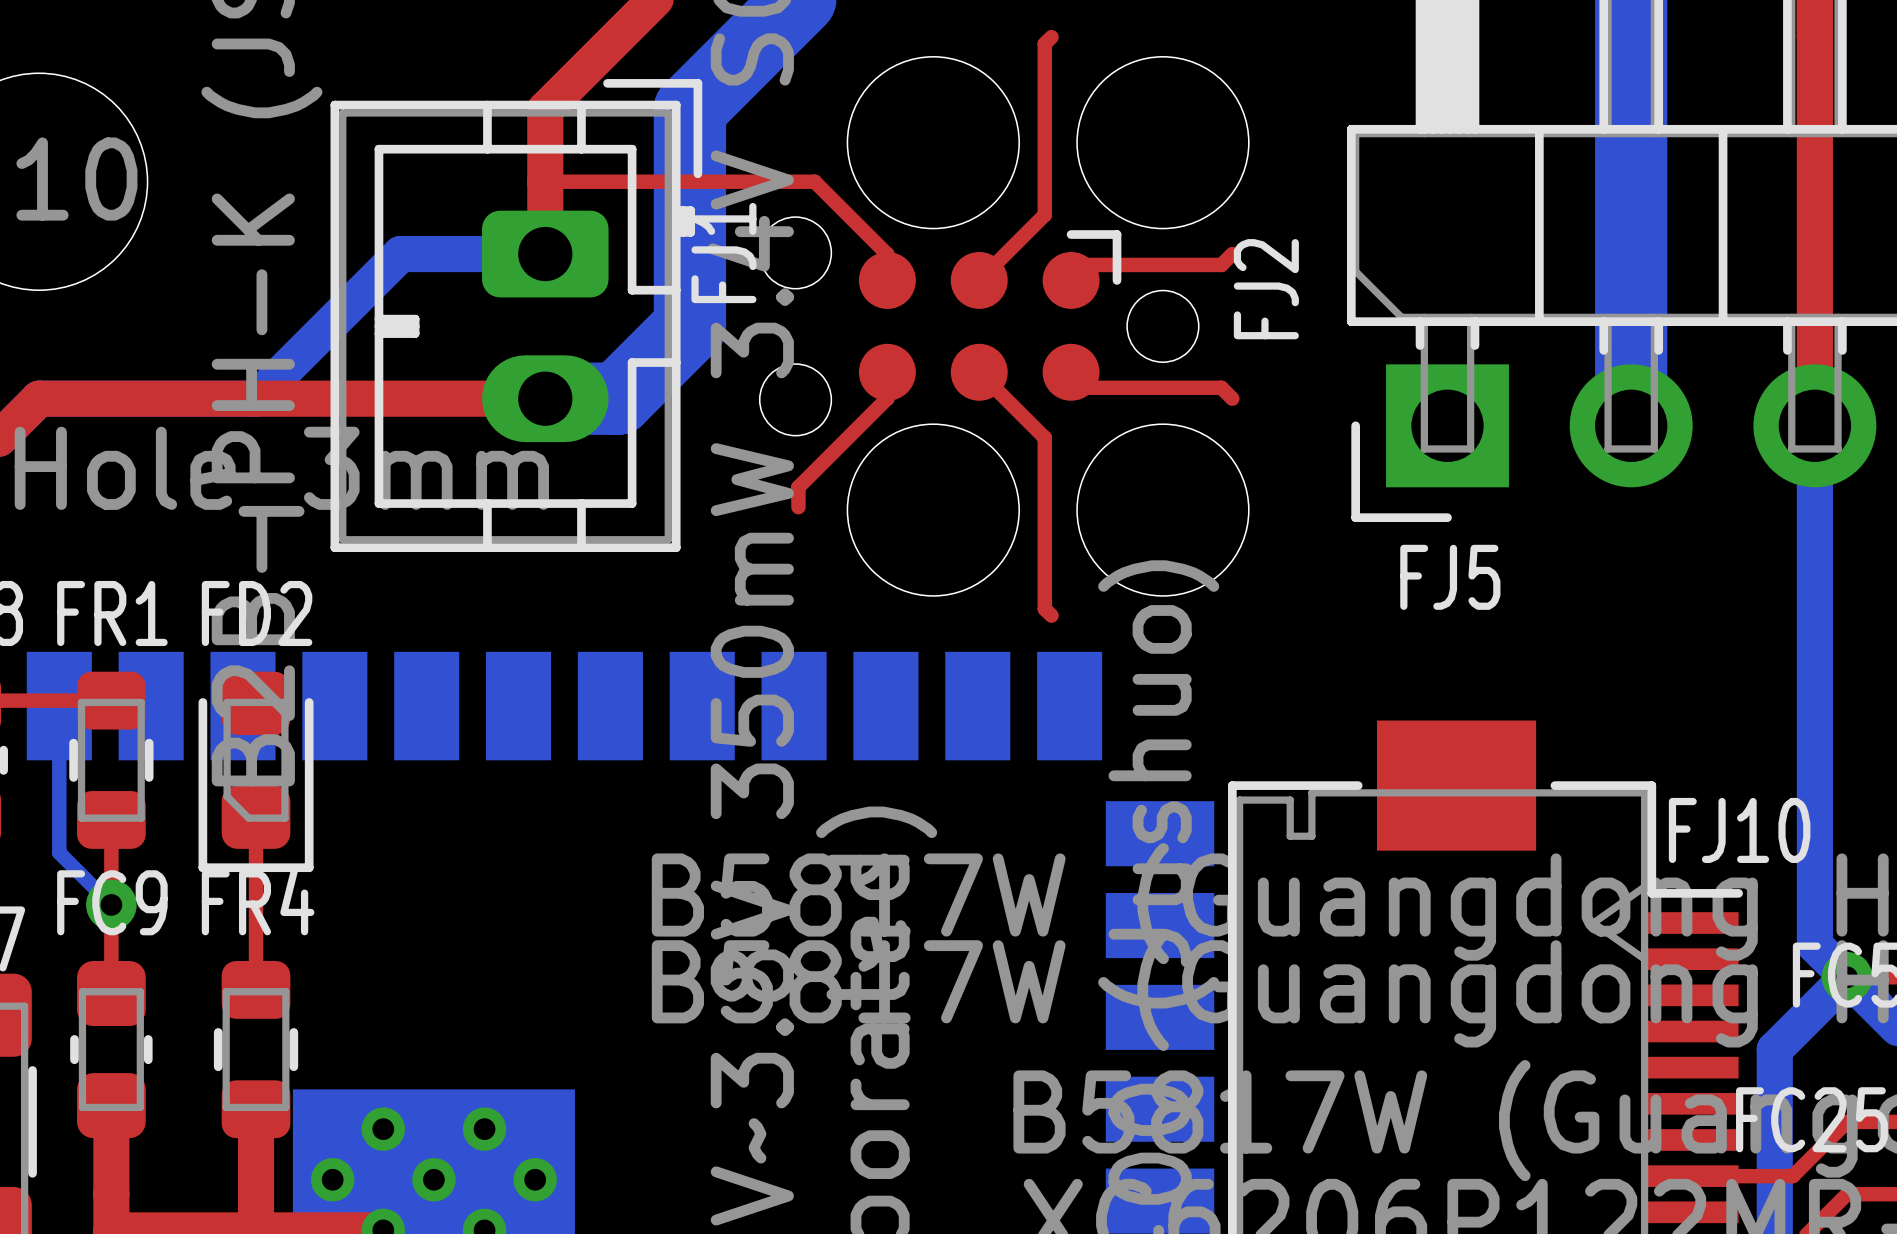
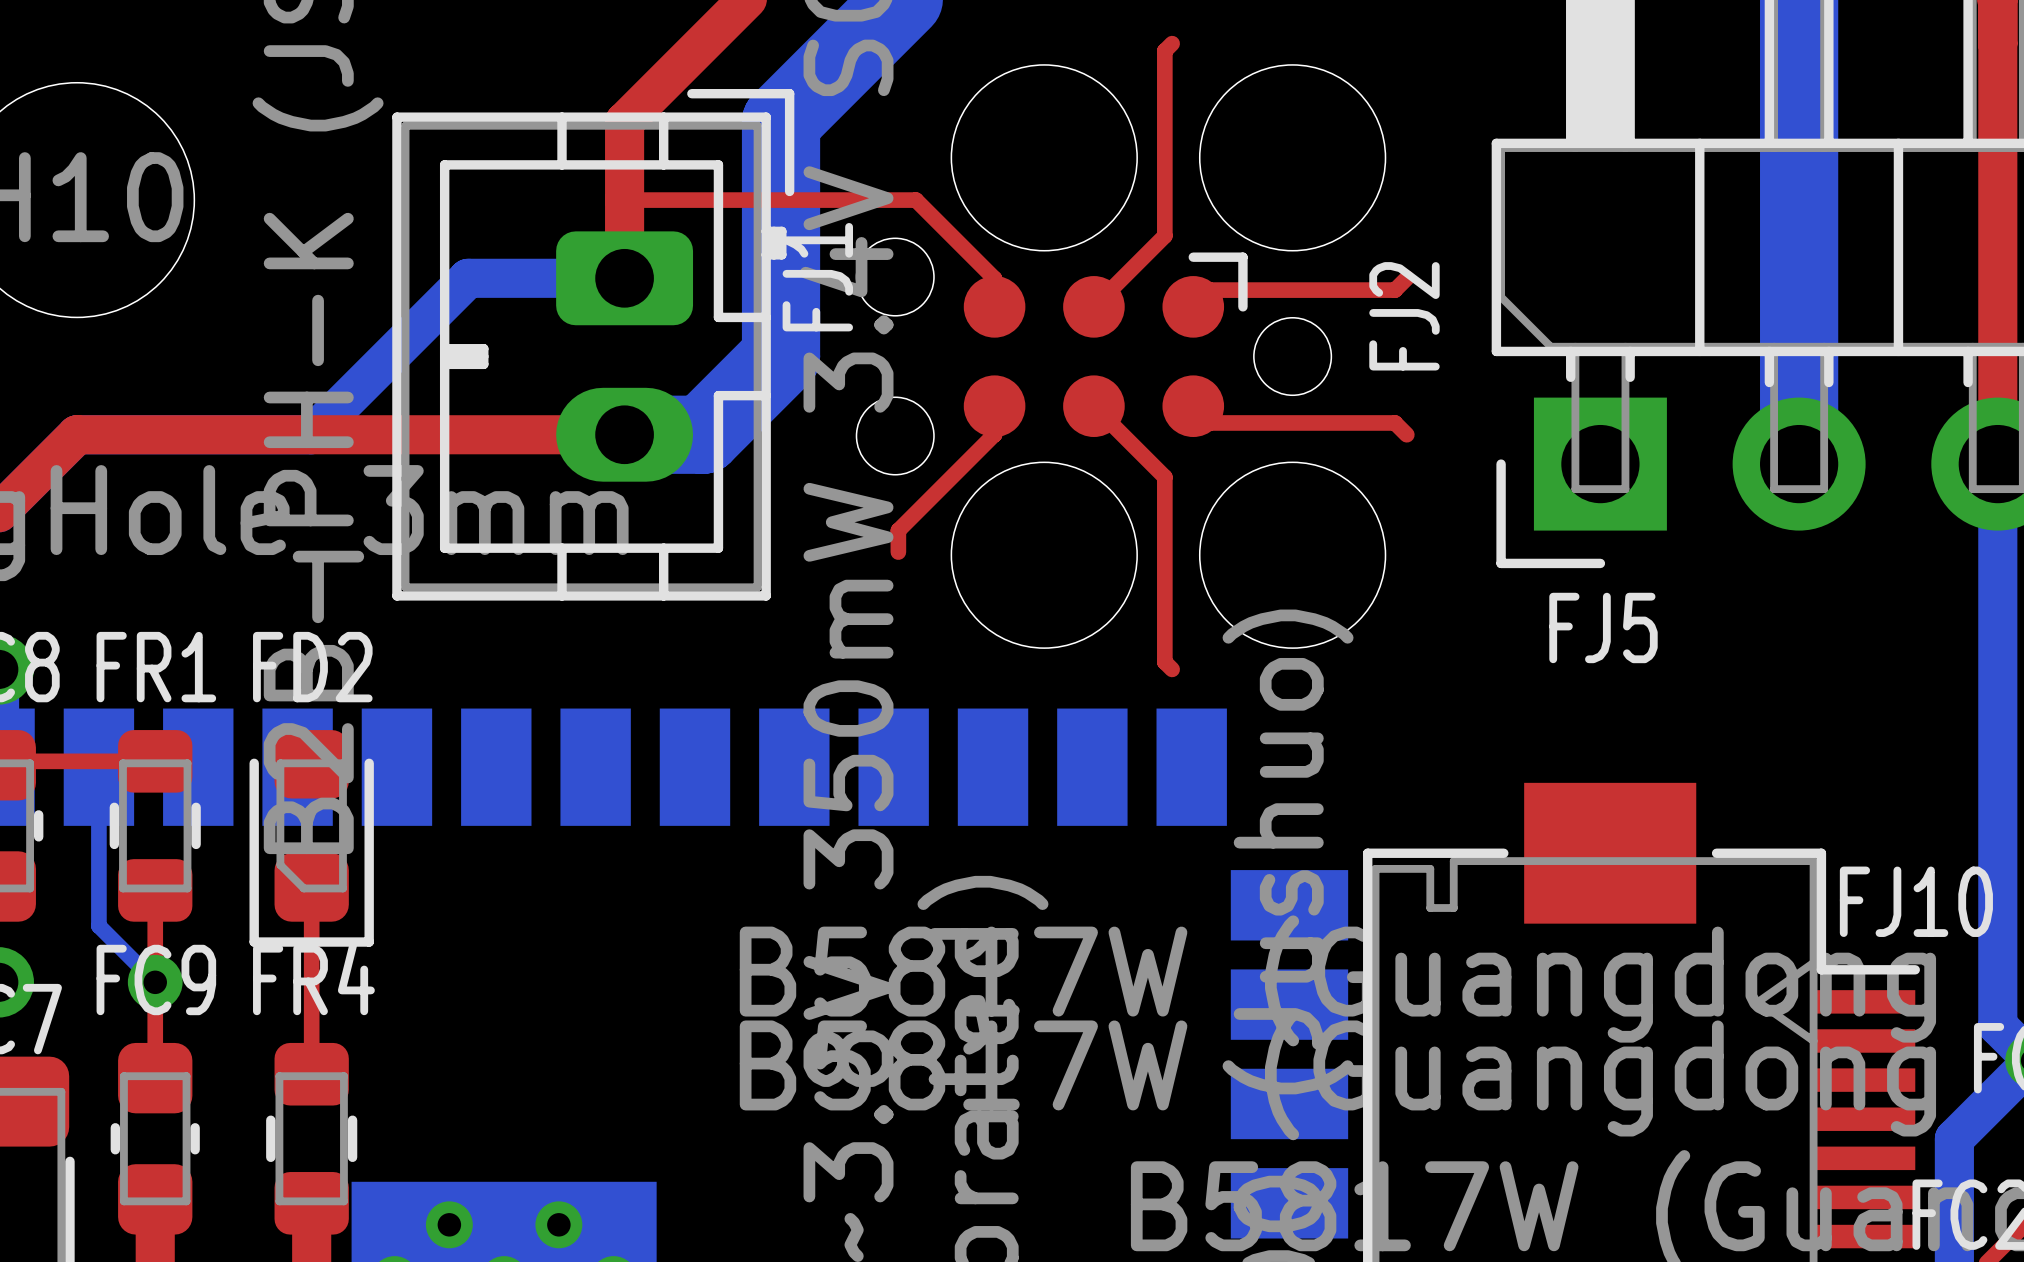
top track: (1232, 254) (1221, 264) -> (1406, 278) (1395, 290) (1355, 290)
top track: (1221, 387) (1232, 398) -> (1355, 422) (1395, 422) (1406, 434)

